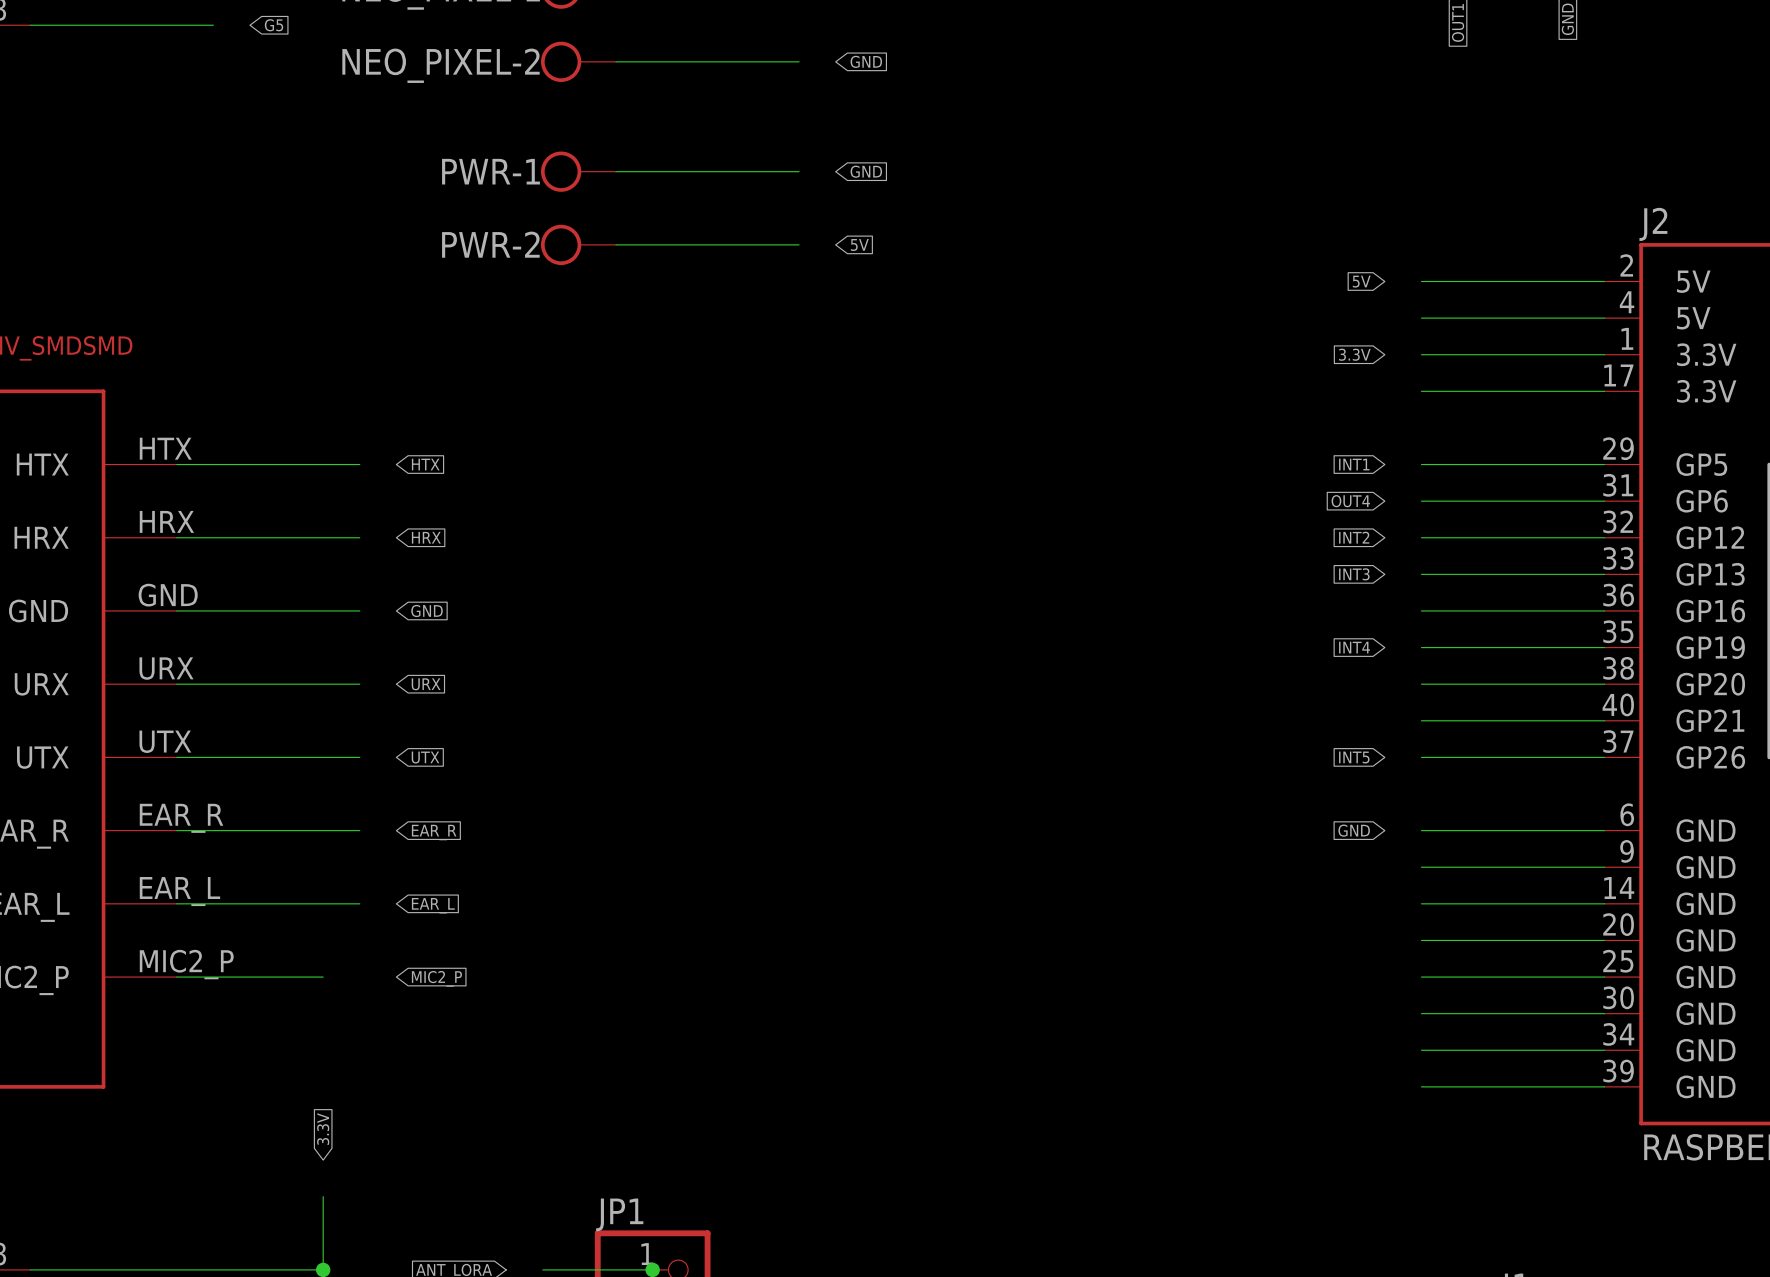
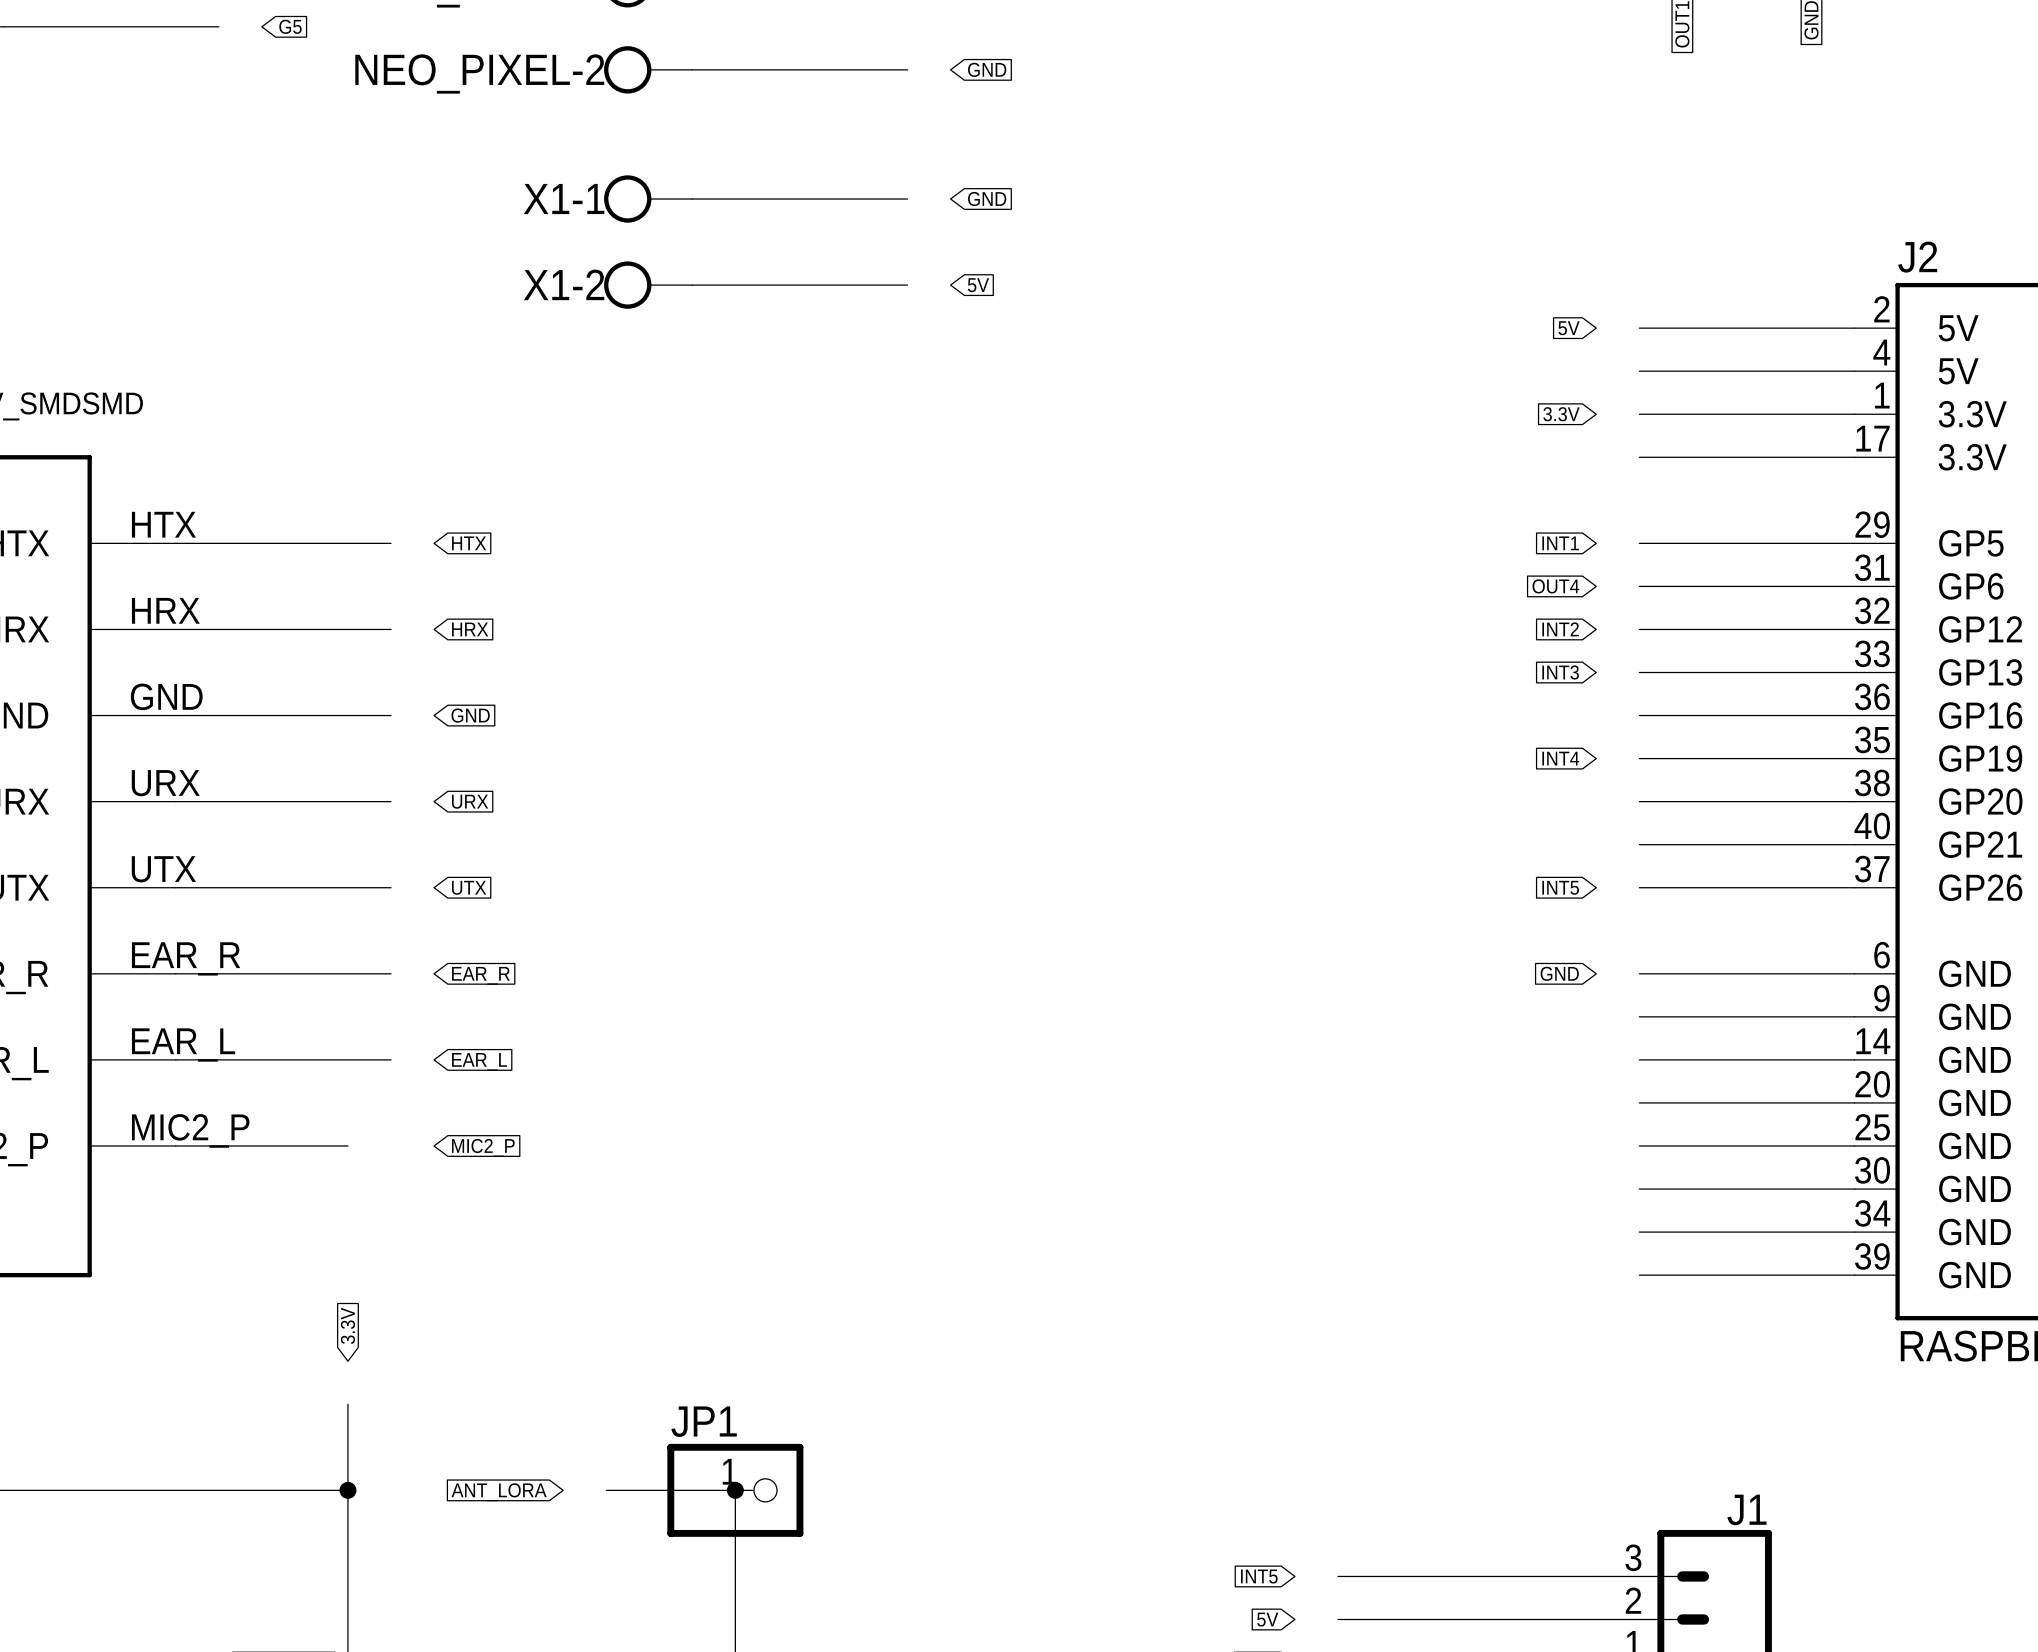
PWR-1 name: PWR-1 (490, 171) -> X1-1 (564, 199)
PWR-2 name: PWR-2 (490, 244) -> X1-2 (564, 284)

